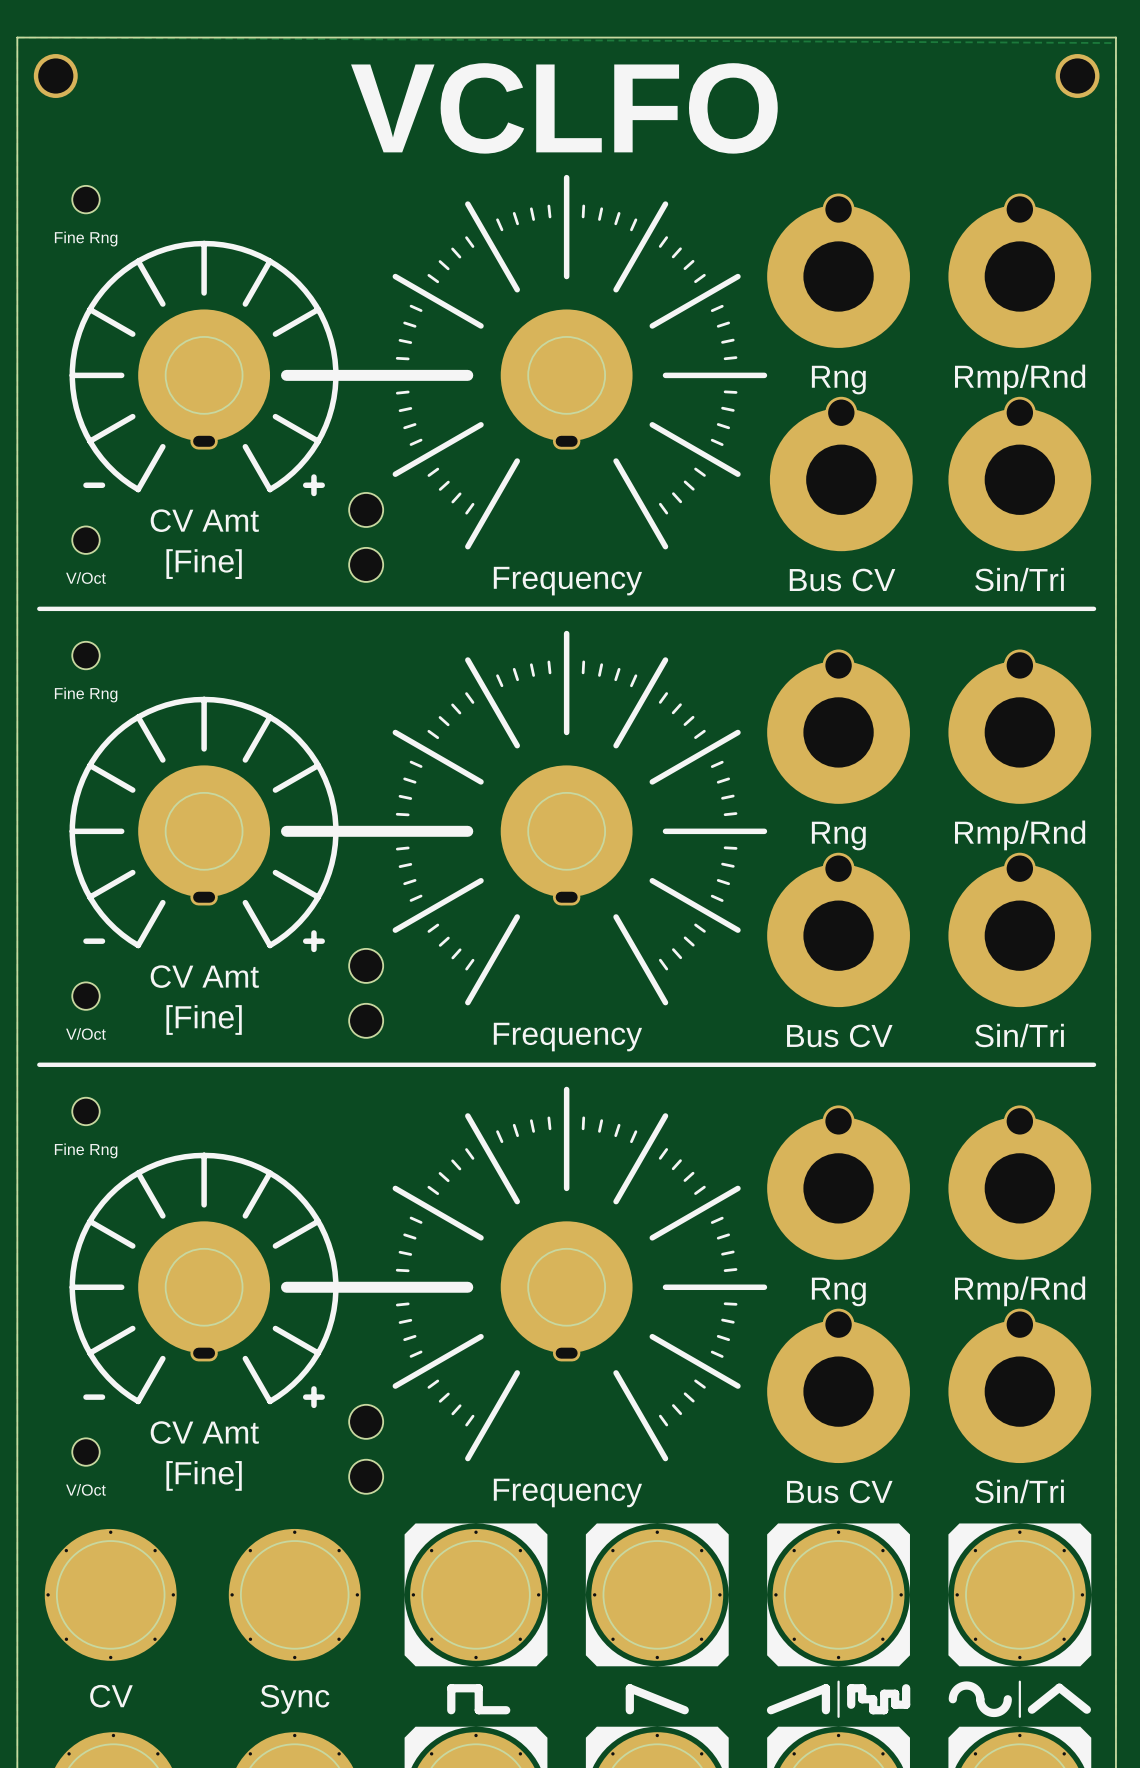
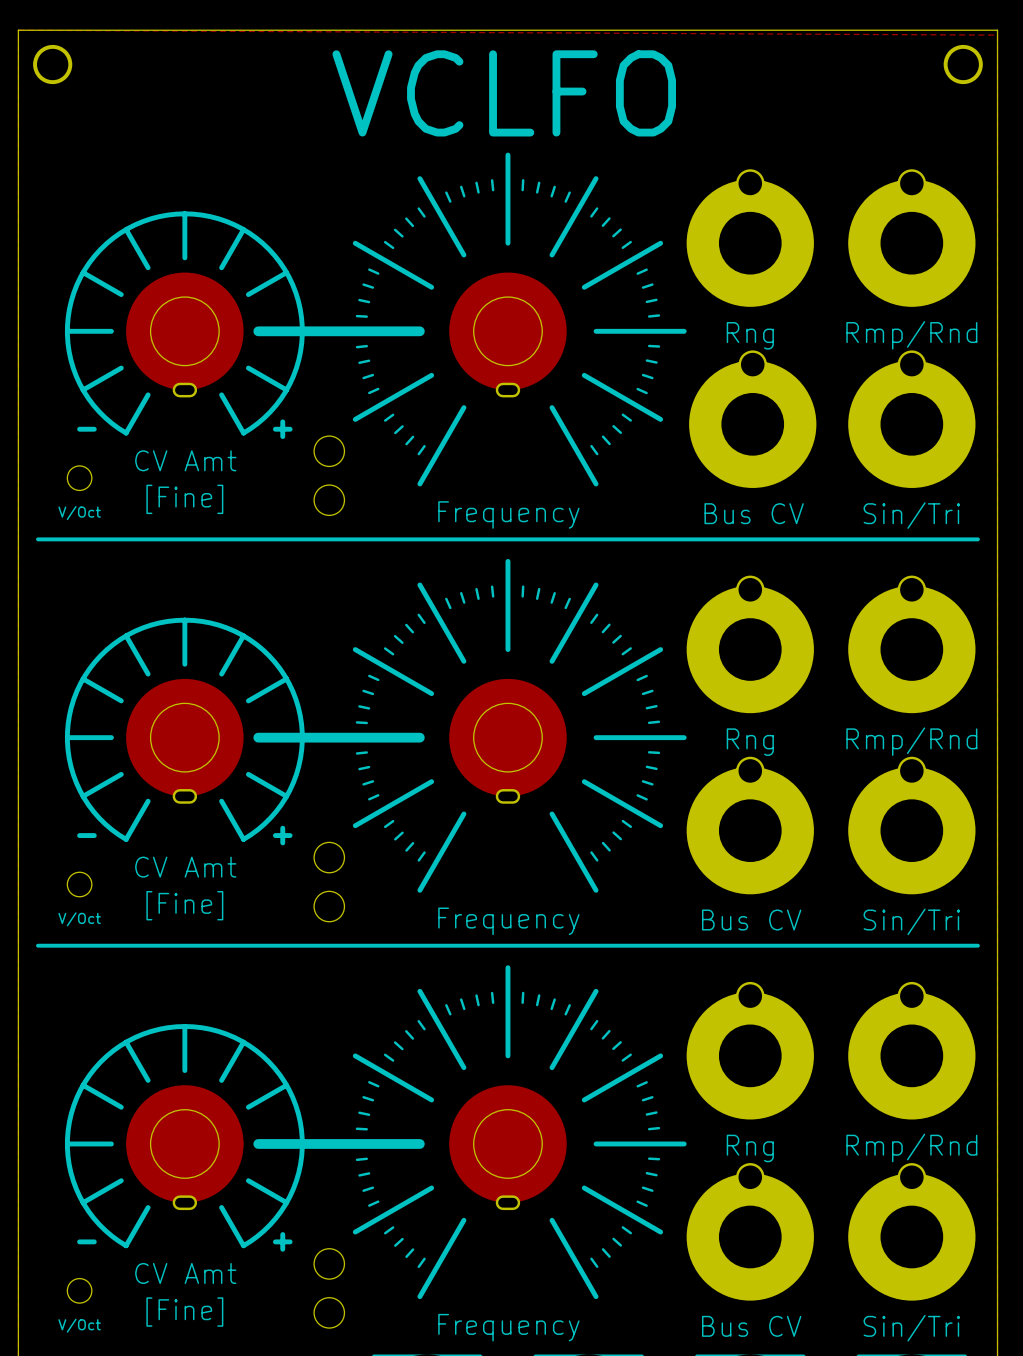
part: Fine Rng (85, 199) -> none
part: Fine Rng (85, 655) -> none
part: Fine Rng (85, 1111) -> none

